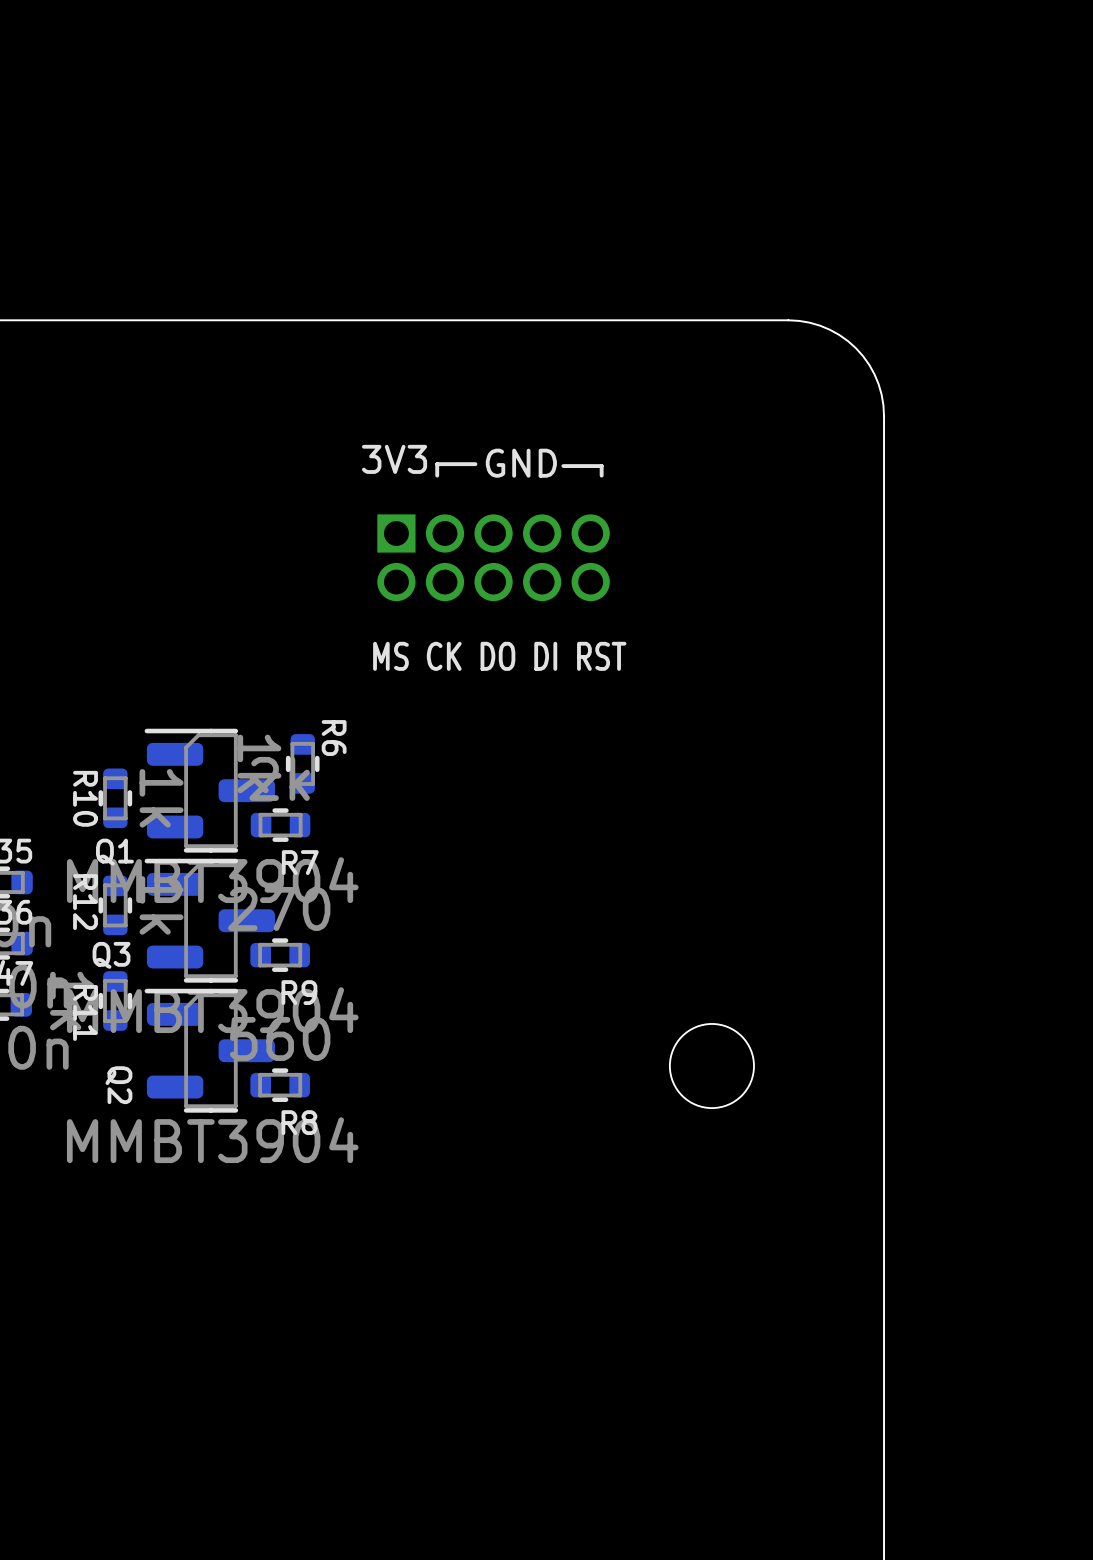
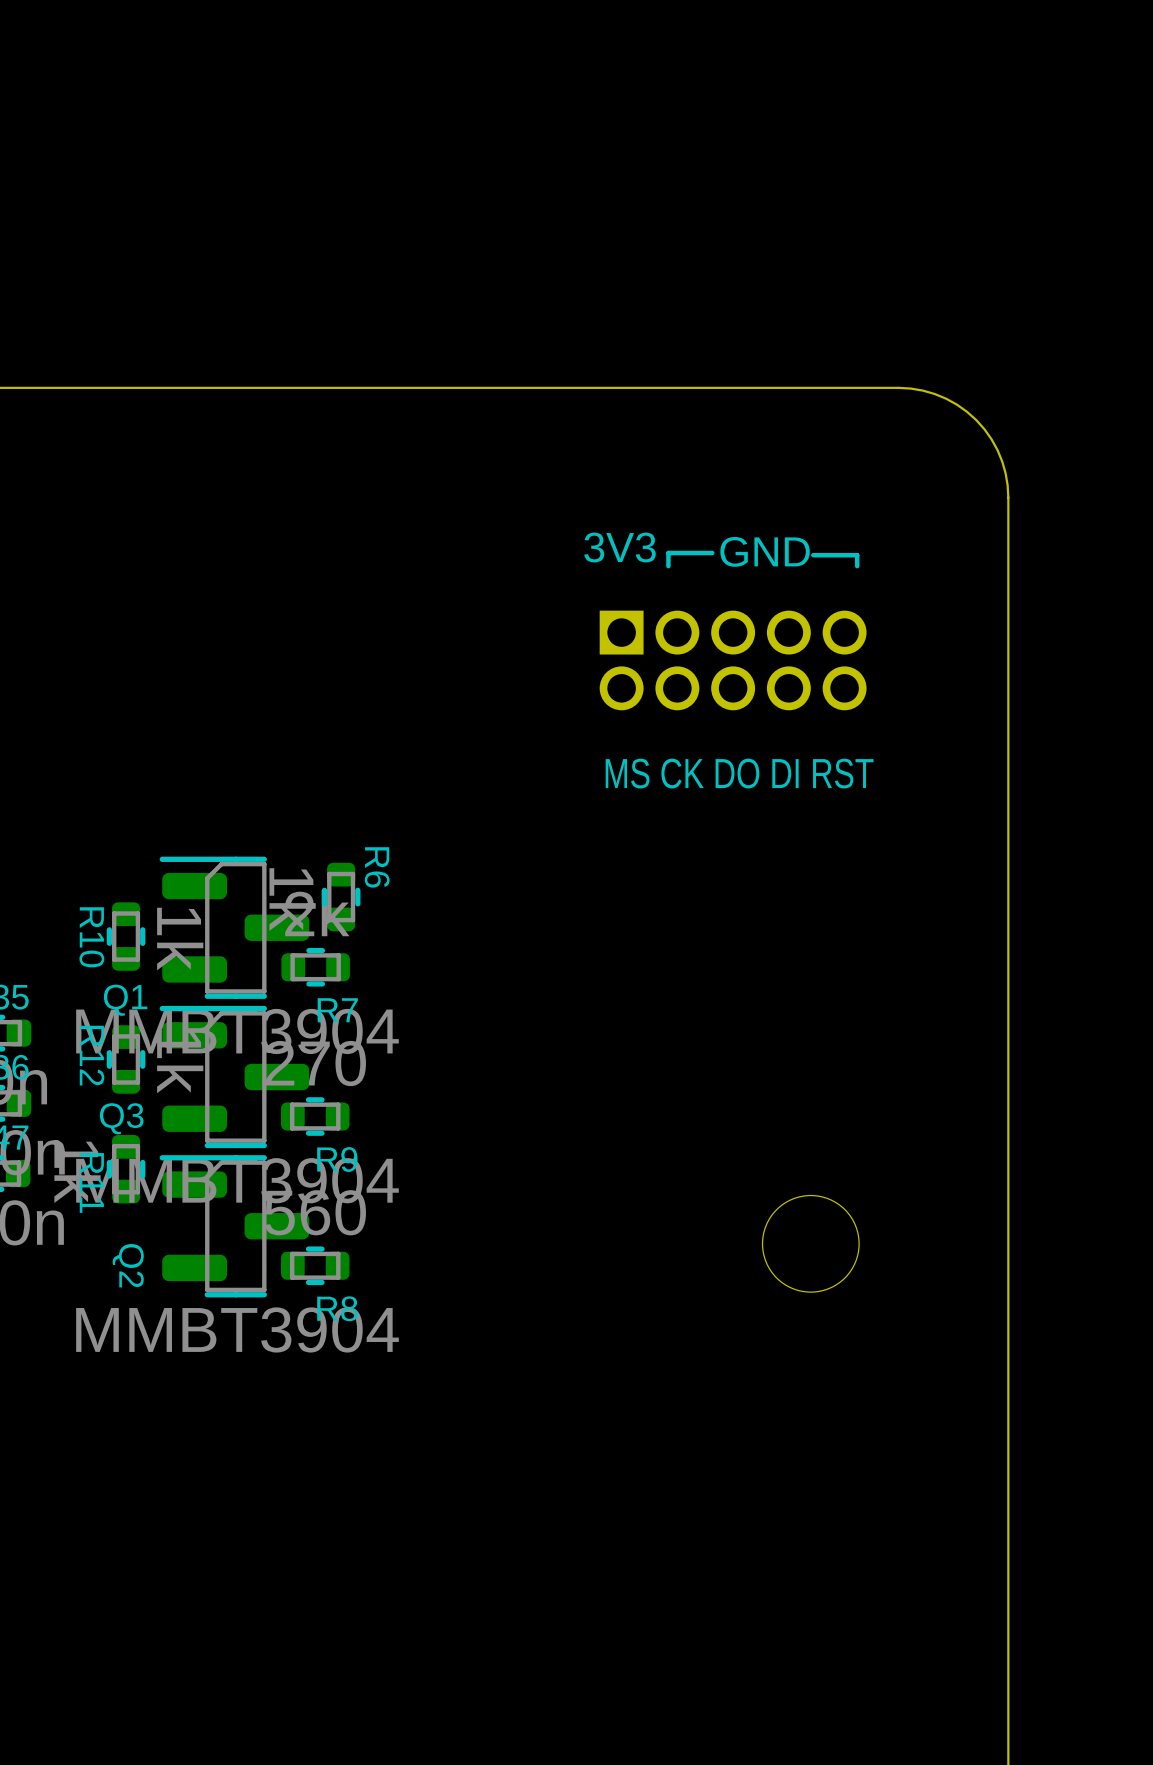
text: 3V3 (394, 459) -> none
text: GND (521, 463) -> 3V3 (620, 547)
text: none -> GND (765, 551)
line: (475, 464) (437, 464) (437, 475) -> (712, 552) (668, 552) (668, 566)
line: (563, 466) (601, 466) (601, 475) -> (813, 555) (857, 555) (857, 566)
part position: (493, 557) -> (733, 660)
text position: MS CK DO DI RST (499, 656) -> MS CK DO DI RST (739, 773)

